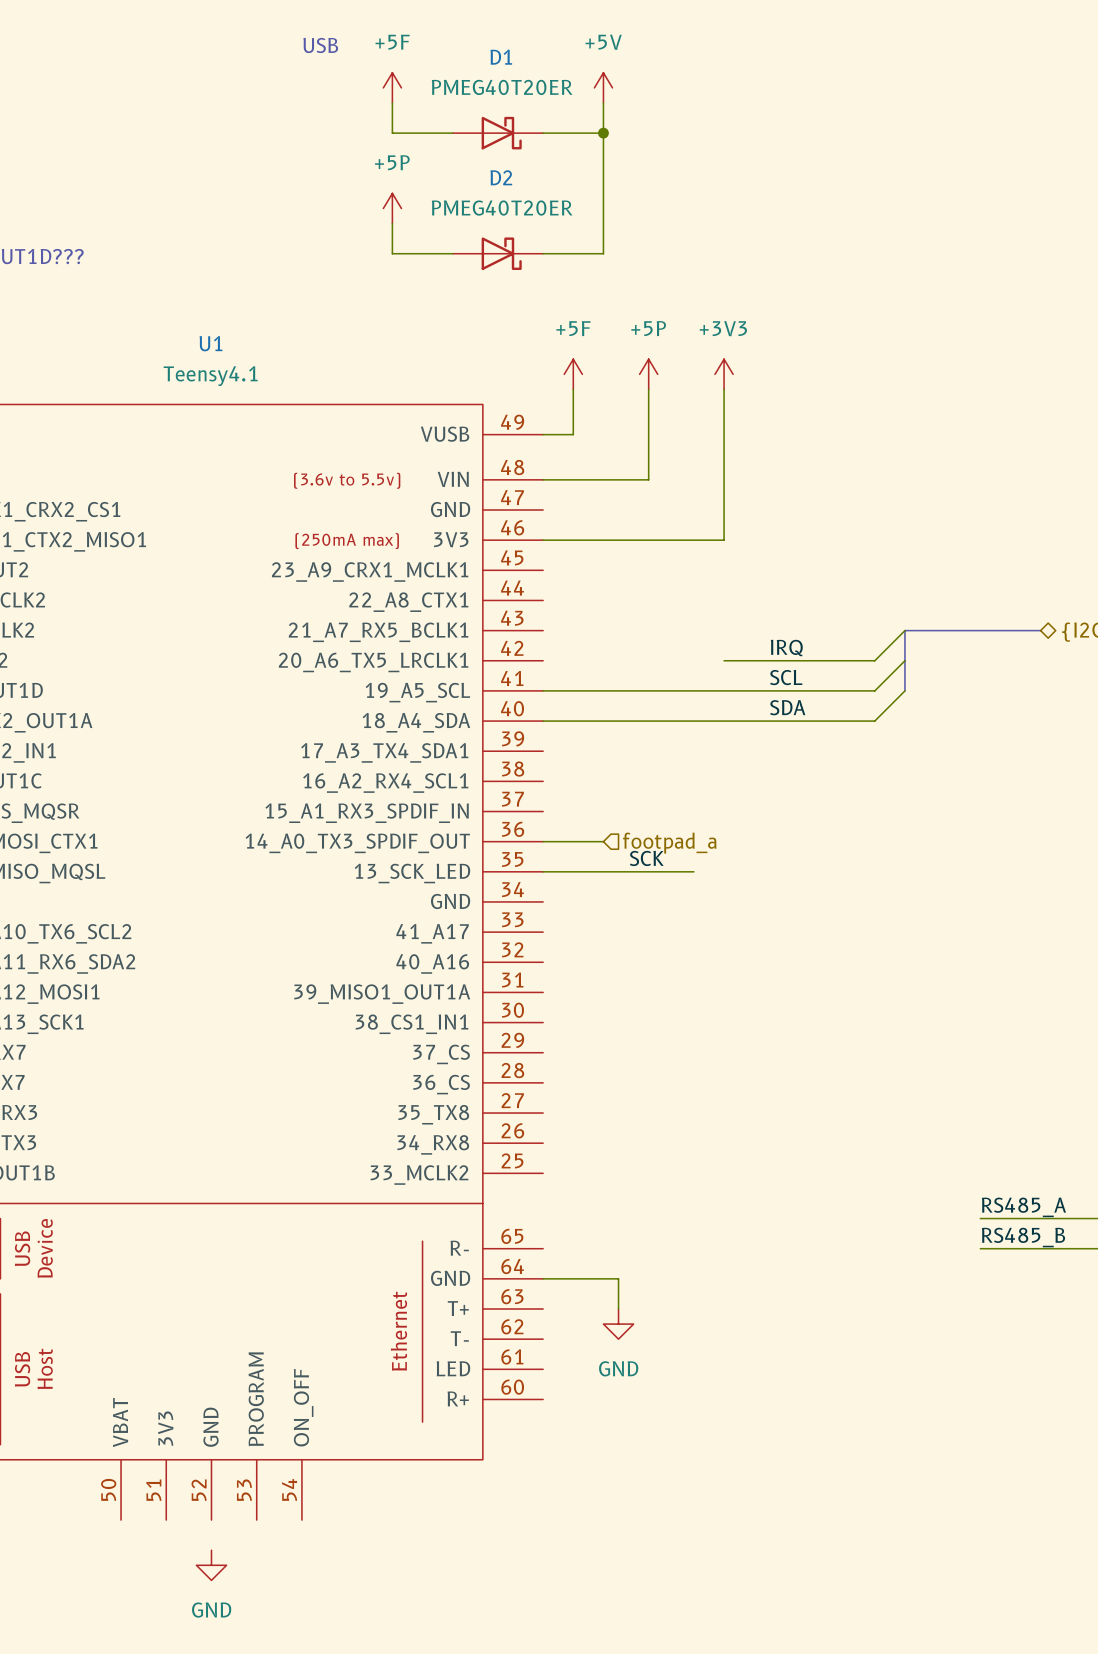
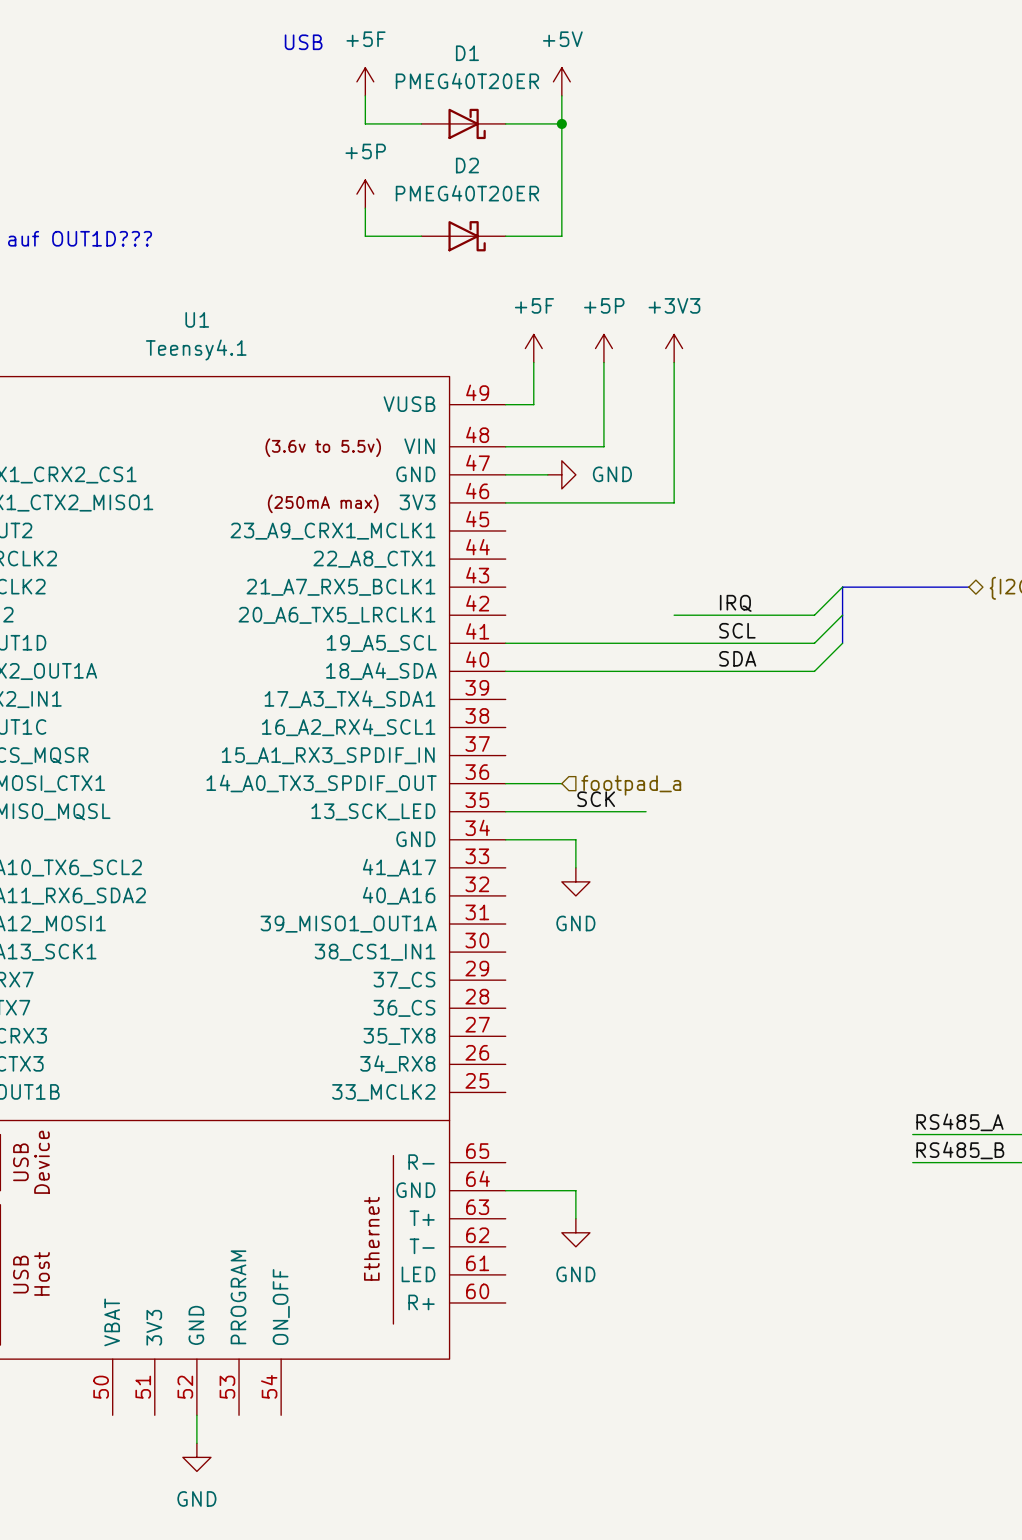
wire: none -> (505, 474) (547, 474)
power symbol: none -> GND (561, 474)
wire: none -> (505, 839) (575, 839) (575, 867)
power symbol: none -> GND (575, 881)
wire: none -> (196, 1415) (196, 1443)

